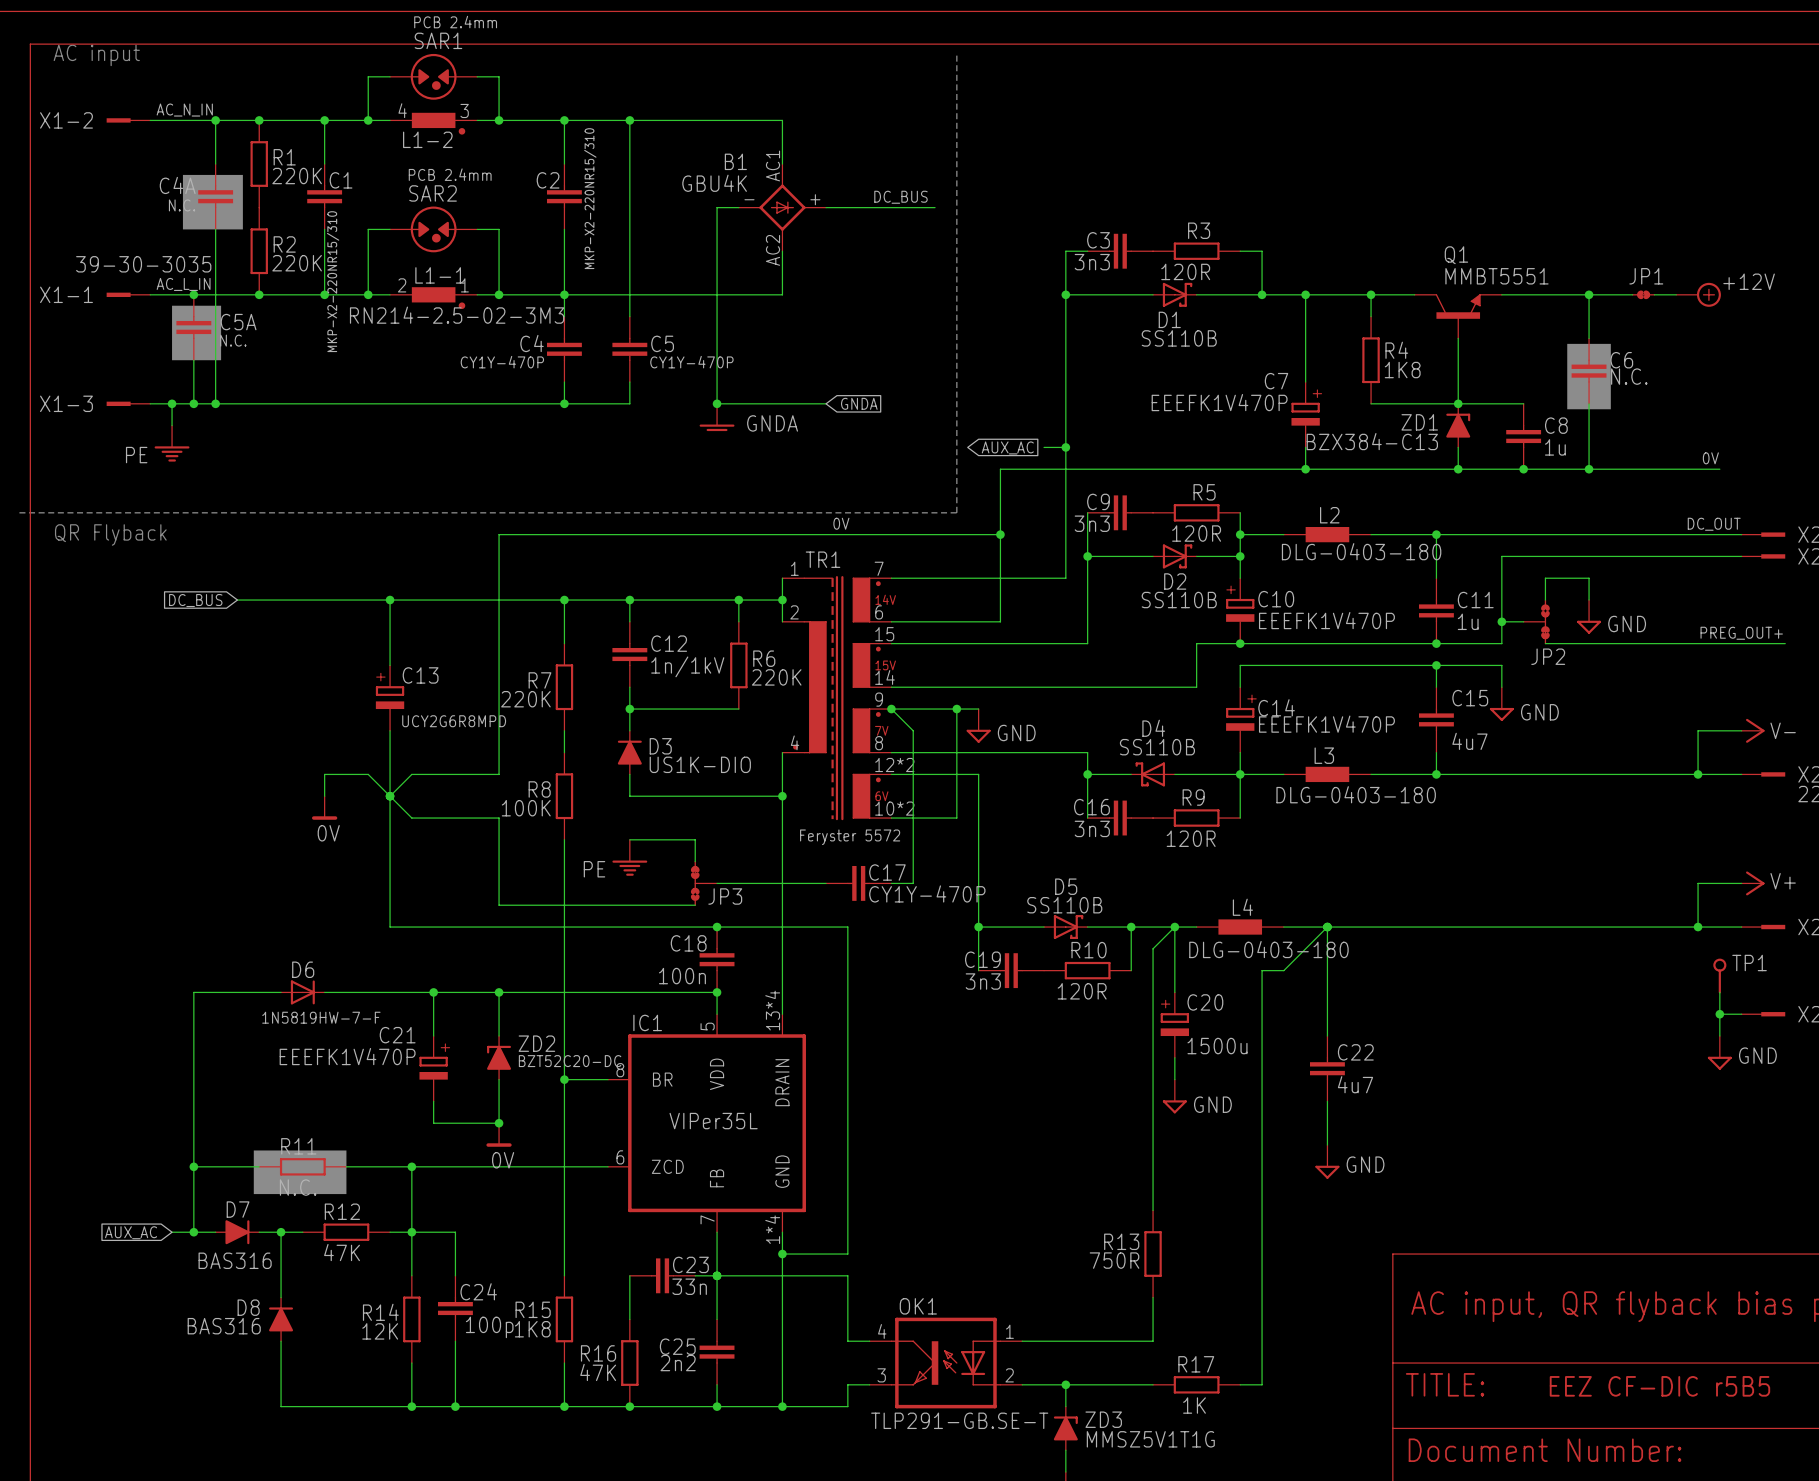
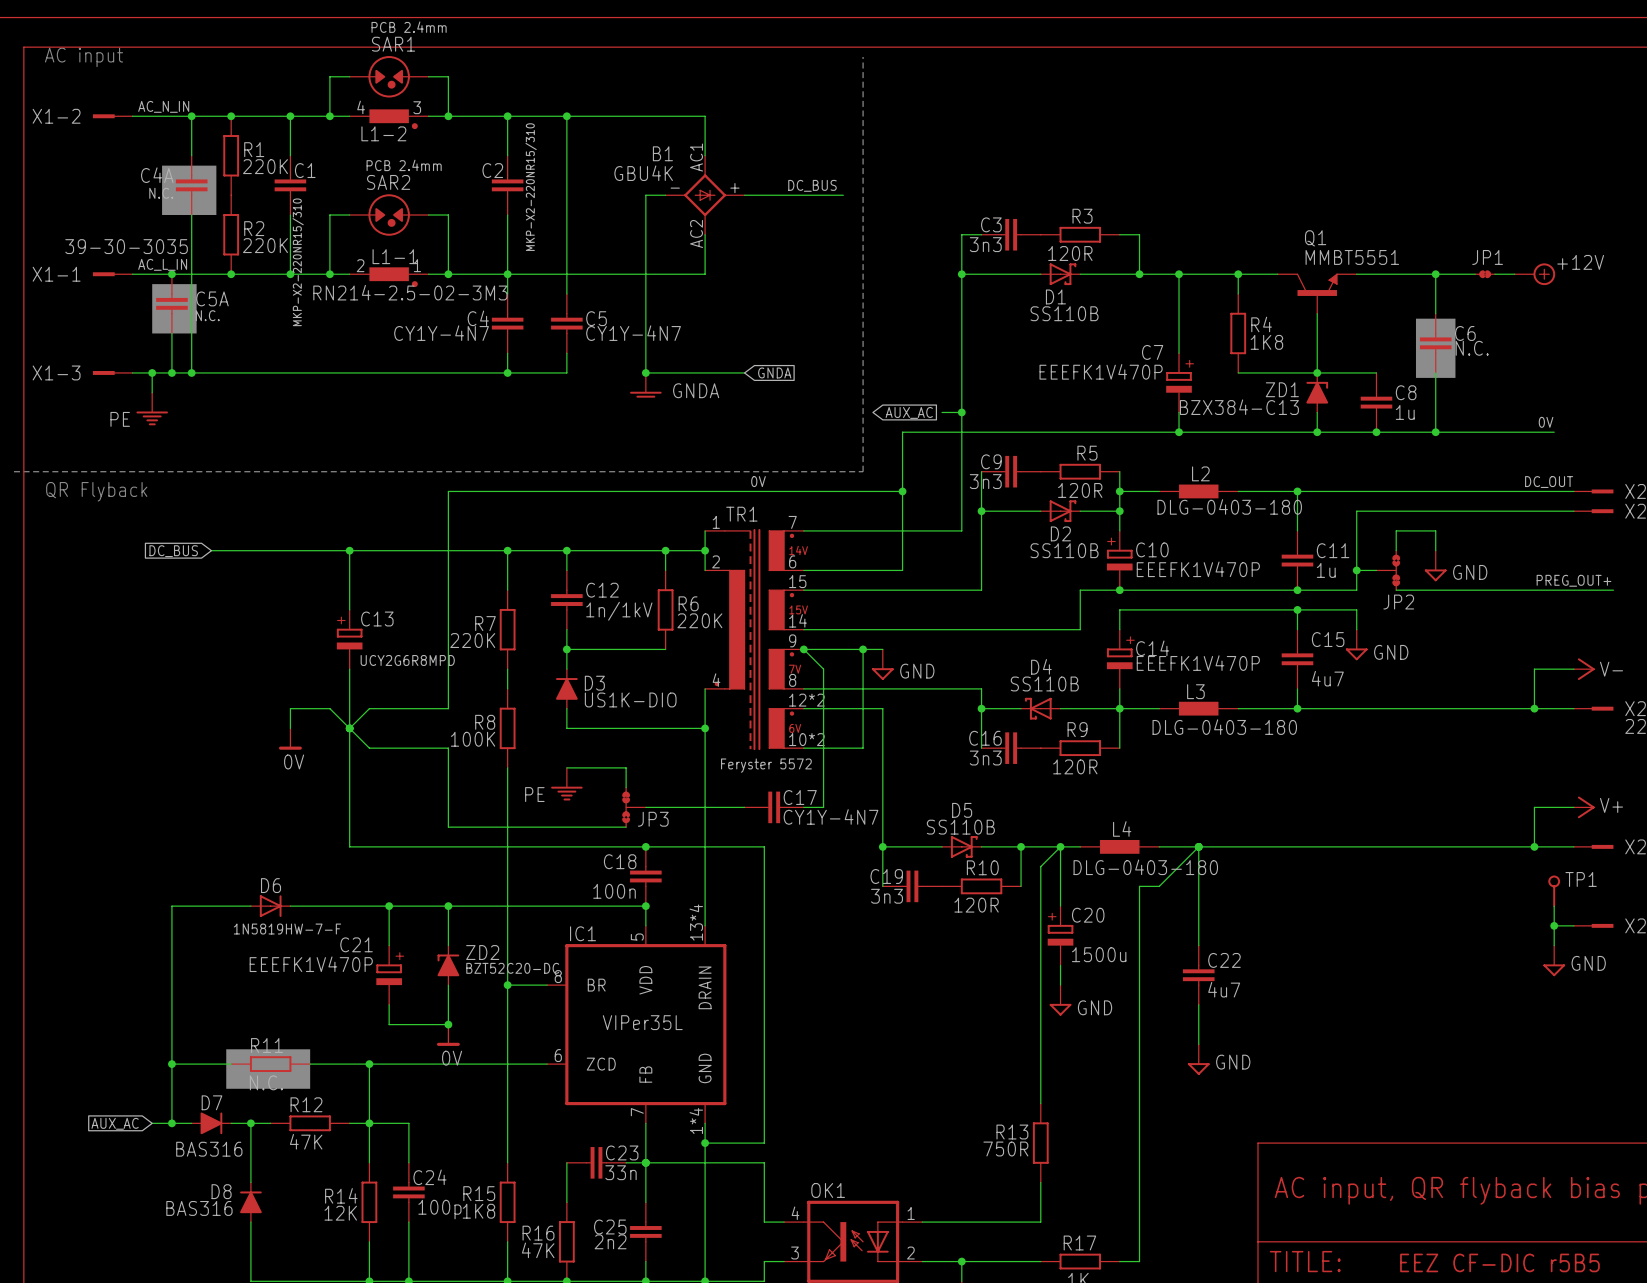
C4 value: CY1Y-470P (502, 362) -> CY1Y-4N7 (441, 333)
C5 value: CY1Y-470P (691, 362) -> CY1Y-4N7 (633, 333)
C17 value: CY1Y-470P (927, 893) -> CY1Y-4N7 (831, 816)

